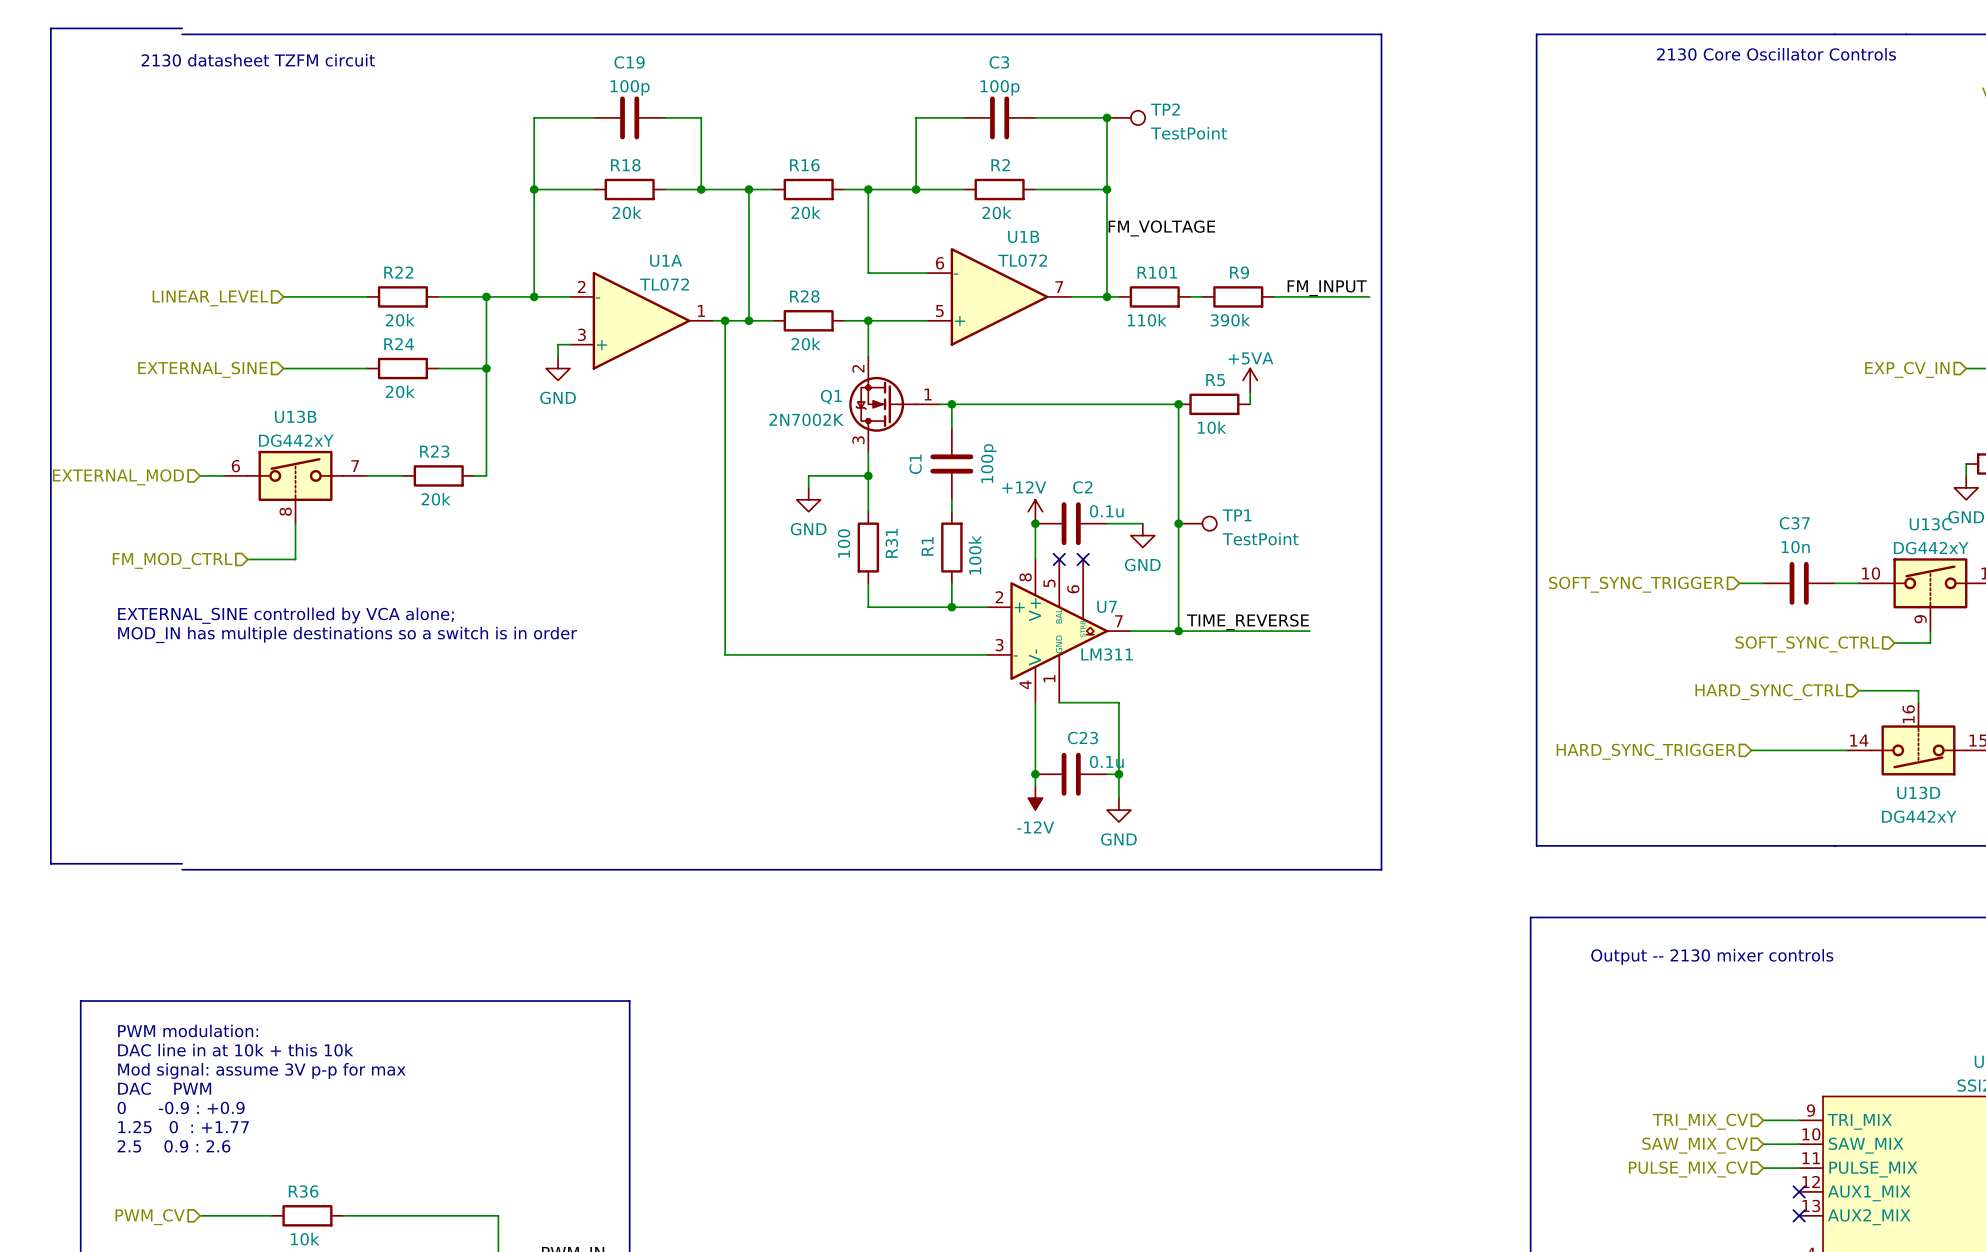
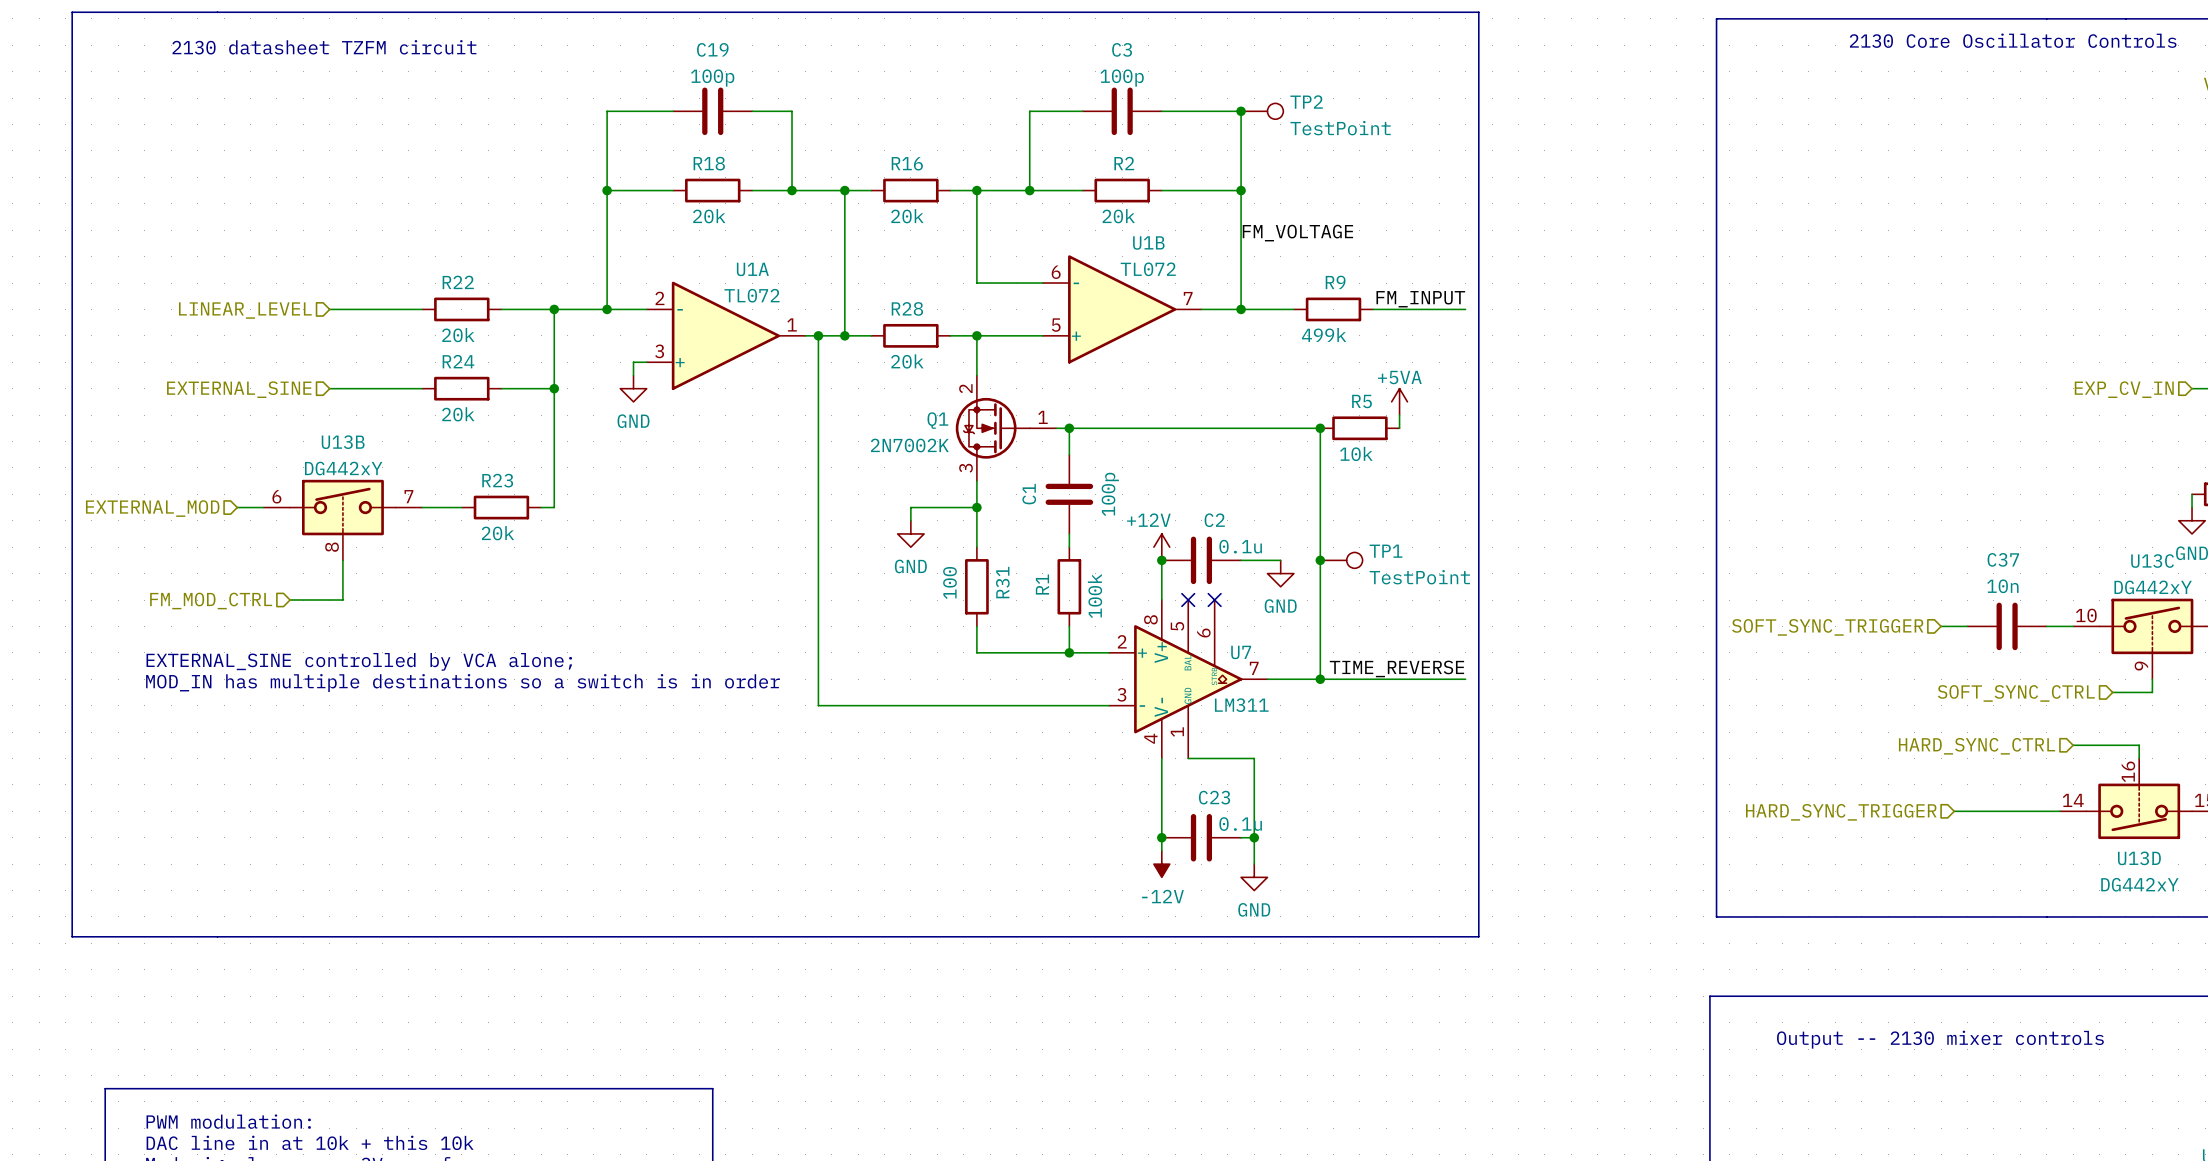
line: none -> (217, 12) (1478, 12) (1478, 936) (217, 936)
line: (182, 34) (1381, 34) (1381, 869) (182, 869) -> none
label position: FM_INPUT (1327, 288) -> FM_INPUT (1420, 299)
wire: none -> (1254, 309) (1293, 309)
R101: 110k (1154, 296) -> none
wire: (1190, 296) (1202, 296) -> none
wire: none -> (1373, 309) (1425, 309)
R9 position: (1238, 296) -> (1333, 309)
wire: (1309, 296) (1369, 296) -> none
R9 value: 390k (1230, 320) -> 499k (1324, 334)

